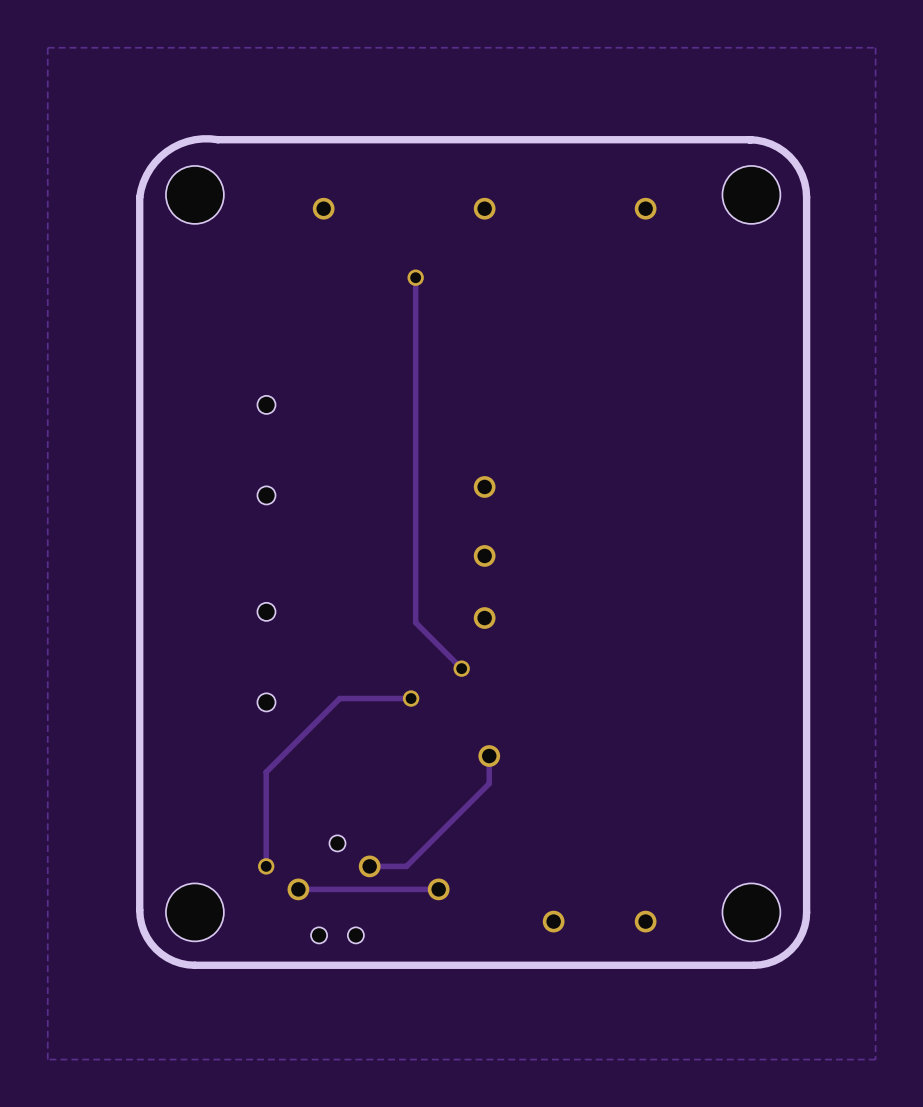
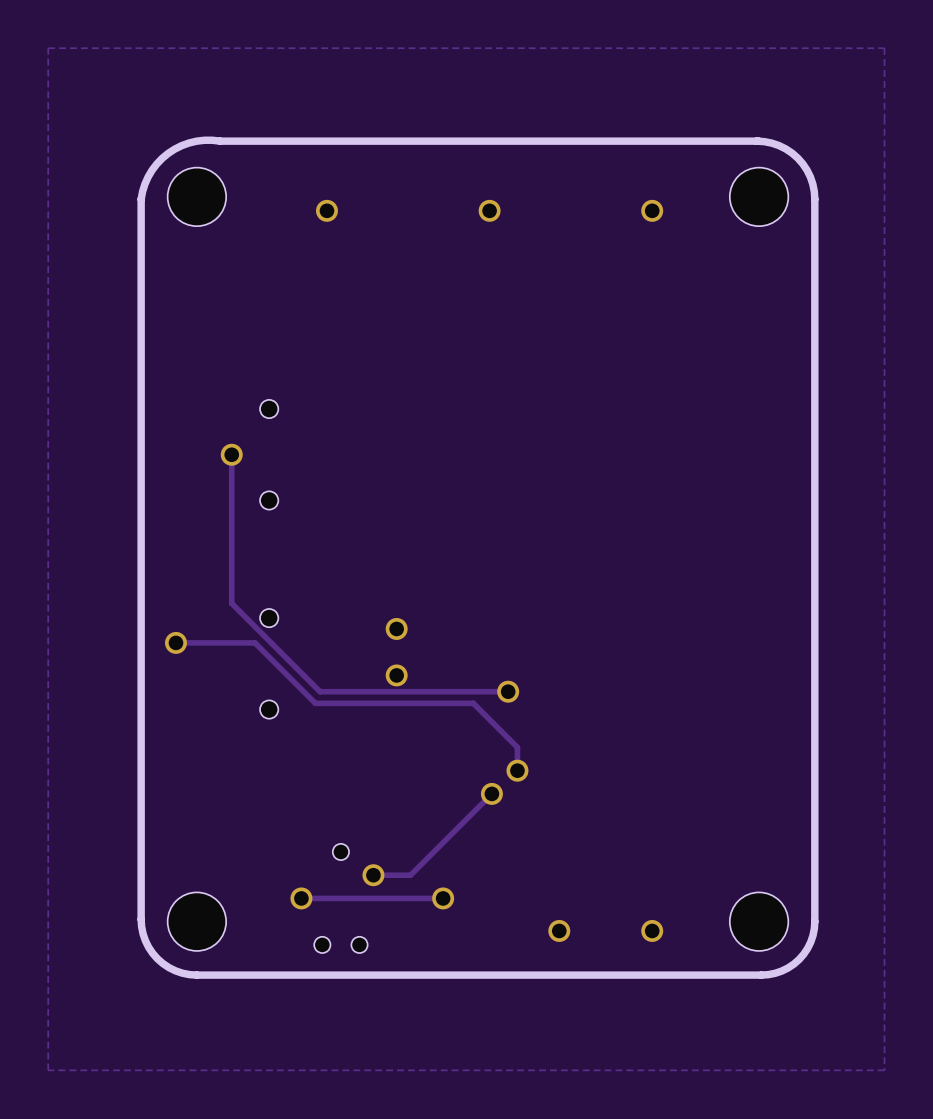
track: (415, 277) (415, 622) (461, 668) -> none
via: (415, 277) -> none
track: none -> (231, 454) (231, 603) (320, 691) (508, 691)
via: none -> (231, 454)
via: (484, 486) -> none
via: (484, 555) -> none
via: (484, 618) -> none
via: none -> (396, 628)
track: none -> (175, 642) (254, 642) (315, 703) (473, 703) (517, 747) (517, 770)
via: none -> (175, 642)
via: none -> (396, 675)
via: (461, 668) -> none
via: none -> (508, 691)
track: (411, 698) (339, 698) (266, 772) (266, 866) -> none
via: (411, 698) -> none
track: (489, 756) (489, 783) (486, 785) -> none
via: (489, 756) -> none
via: none -> (517, 770)
via: none -> (491, 793)
via: (266, 866) -> none

